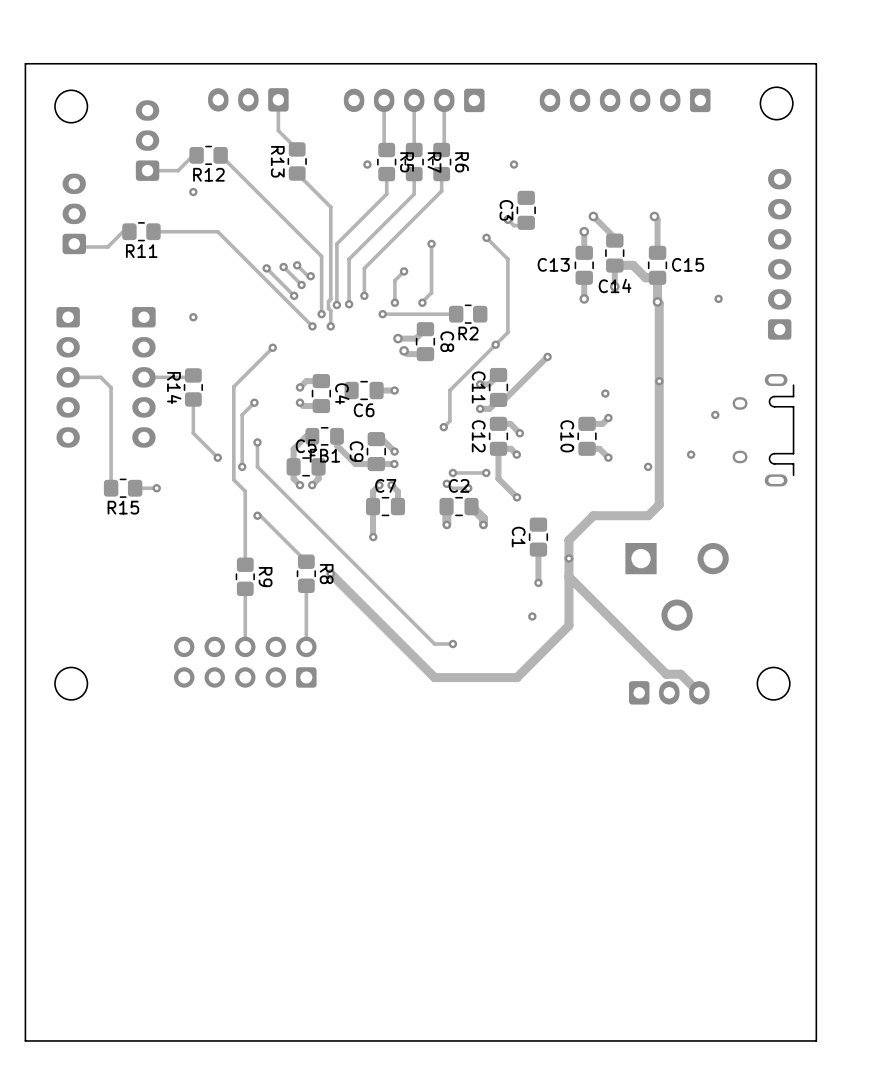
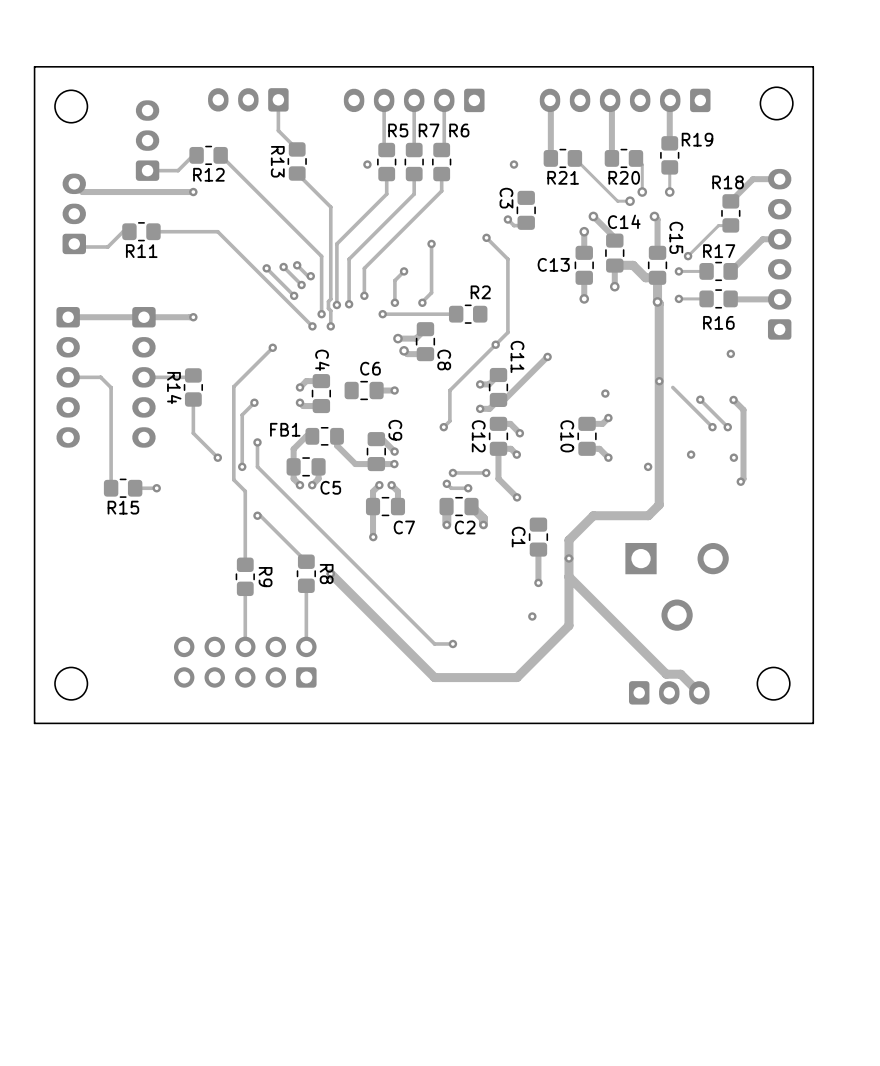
board edge: (816, 63) (25, 63) (25, 1040) (816, 1040) (816, 63) -> (813, 66) (813, 723) (34, 723) (34, 66) (813, 66)
track: none -> (550, 100) (550, 158)
track: none -> (610, 100) (611, 102) (611, 158)
track: none -> (670, 100) (669, 143)
R19: none -> (669, 155)
R21: none -> (562, 158)
track: none -> (574, 158) (617, 201) (630, 201)
R20: none -> (623, 158)
track: none -> (635, 158) (642, 164) (642, 192)
R5 name rotation: 0° (407, 162) -> 90° counterclockwise (398, 130)
R5 name position: R5 (407, 162) -> R5 (398, 130)
R7 name rotation: 0° (434, 162) -> 90° counterclockwise (429, 130)
R7 name position: R7 (434, 162) -> R7 (429, 130)
R6 name rotation: 0° (461, 162) -> 90° counterclockwise (459, 130)
R6 name position: R6 (461, 162) -> R6 (459, 130)
track: none -> (669, 167) (669, 192)
track: none -> (779, 179) (753, 179) (730, 201)
track: none -> (74, 183) (82, 192) (193, 192)
via: none -> (642, 192)
via: none -> (669, 192)
via: none -> (630, 201)
C3 name position: C3 (506, 210) -> C3 (506, 198)
R18: none -> (730, 213)
track: none -> (730, 225) (718, 225) (688, 256)
track: none -> (779, 239) (762, 239) (730, 271)
via: none -> (688, 256)
C15 name rotation: 0° (688, 264) -> 90° clockwise (676, 237)
via: none -> (678, 271)
track: none -> (706, 271) (678, 271)
R17: none -> (718, 271)
C14 name position: C14 (615, 285) -> C14 (624, 221)
via: none -> (678, 298)
track: none -> (706, 298) (678, 298)
R16: none -> (718, 298)
via: (718, 298) -> none
track: none -> (730, 298) (779, 299)
track: none -> (190, 317) (68, 317)
R2 name position: R2 (468, 333) -> R2 (480, 292)
C8 name position: C8 (447, 341) -> C8 (444, 359)
via: none -> (730, 353)
C11 name position: C11 (478, 387) -> C11 (517, 356)
track: none -> (672, 387) (712, 427)
C4 name position: C4 (342, 393) -> C4 (322, 360)
track: none -> (700, 399) (727, 427)
via: none -> (700, 399)
track: none -> (733, 399) (743, 409) (743, 479) (740, 481)
via: none -> (733, 399)
C6 name position: C6 (364, 410) -> C6 (370, 368)
via: (715, 414) -> none
via: none -> (712, 427)
via: none -> (727, 427)
part: (763, 430) -> none
C5 name position: C5 (306, 446) -> C5 (330, 487)
C9 name position: C9 (356, 451) -> C9 (395, 430)
FB1 name position: FB1 (324, 455) -> FB1 (285, 429)
via: none -> (733, 457)
via: none -> (740, 481)
C7 name position: C7 (385, 485) -> C7 (404, 527)
C2 name position: C2 (459, 485) -> C2 (465, 527)

